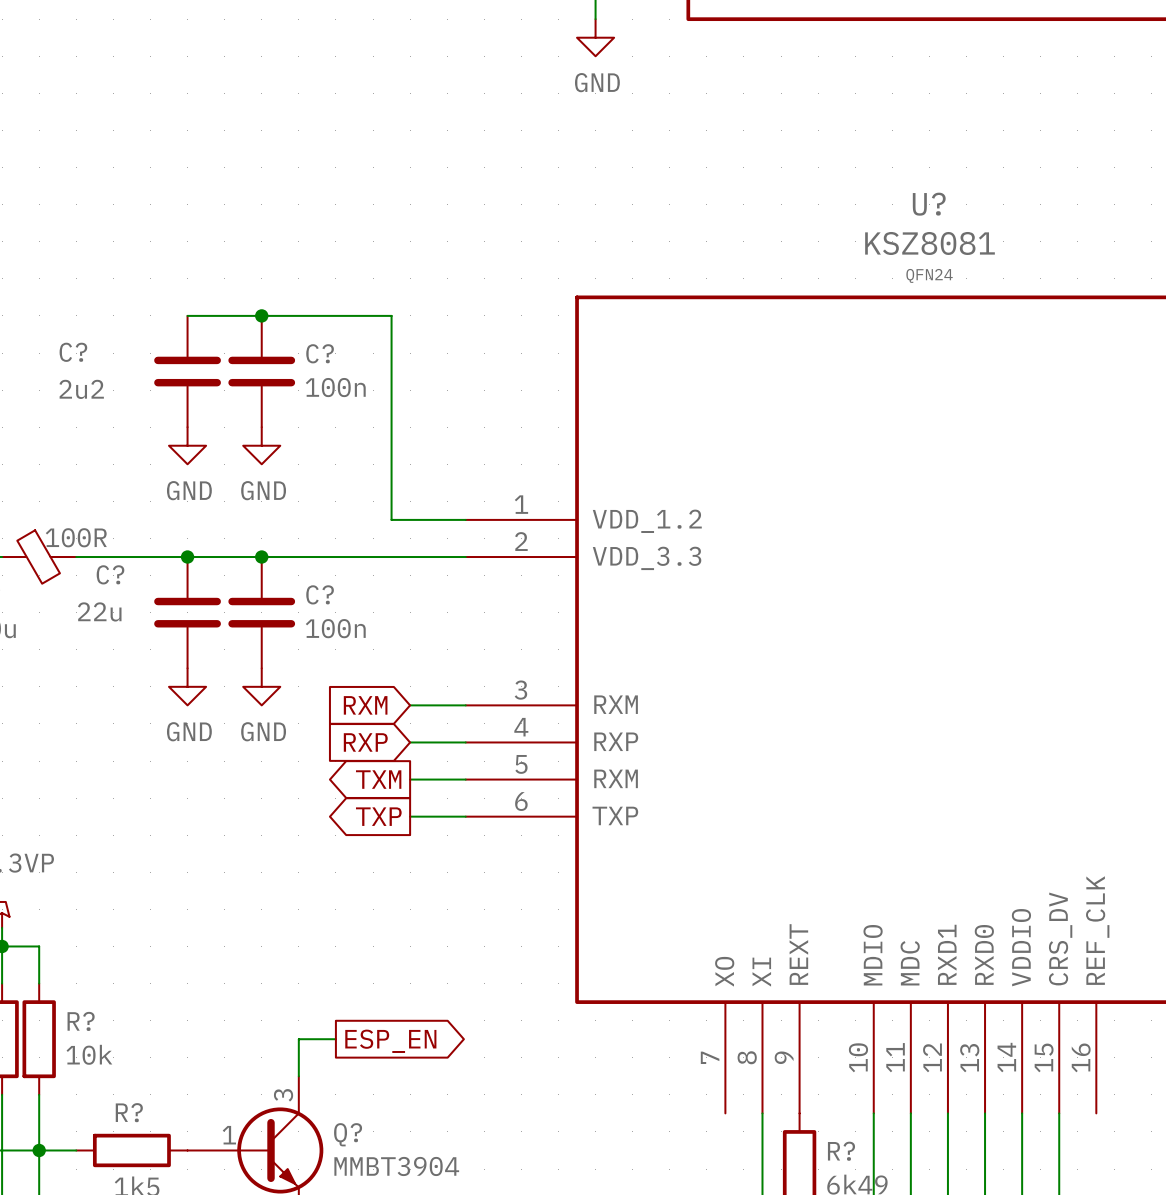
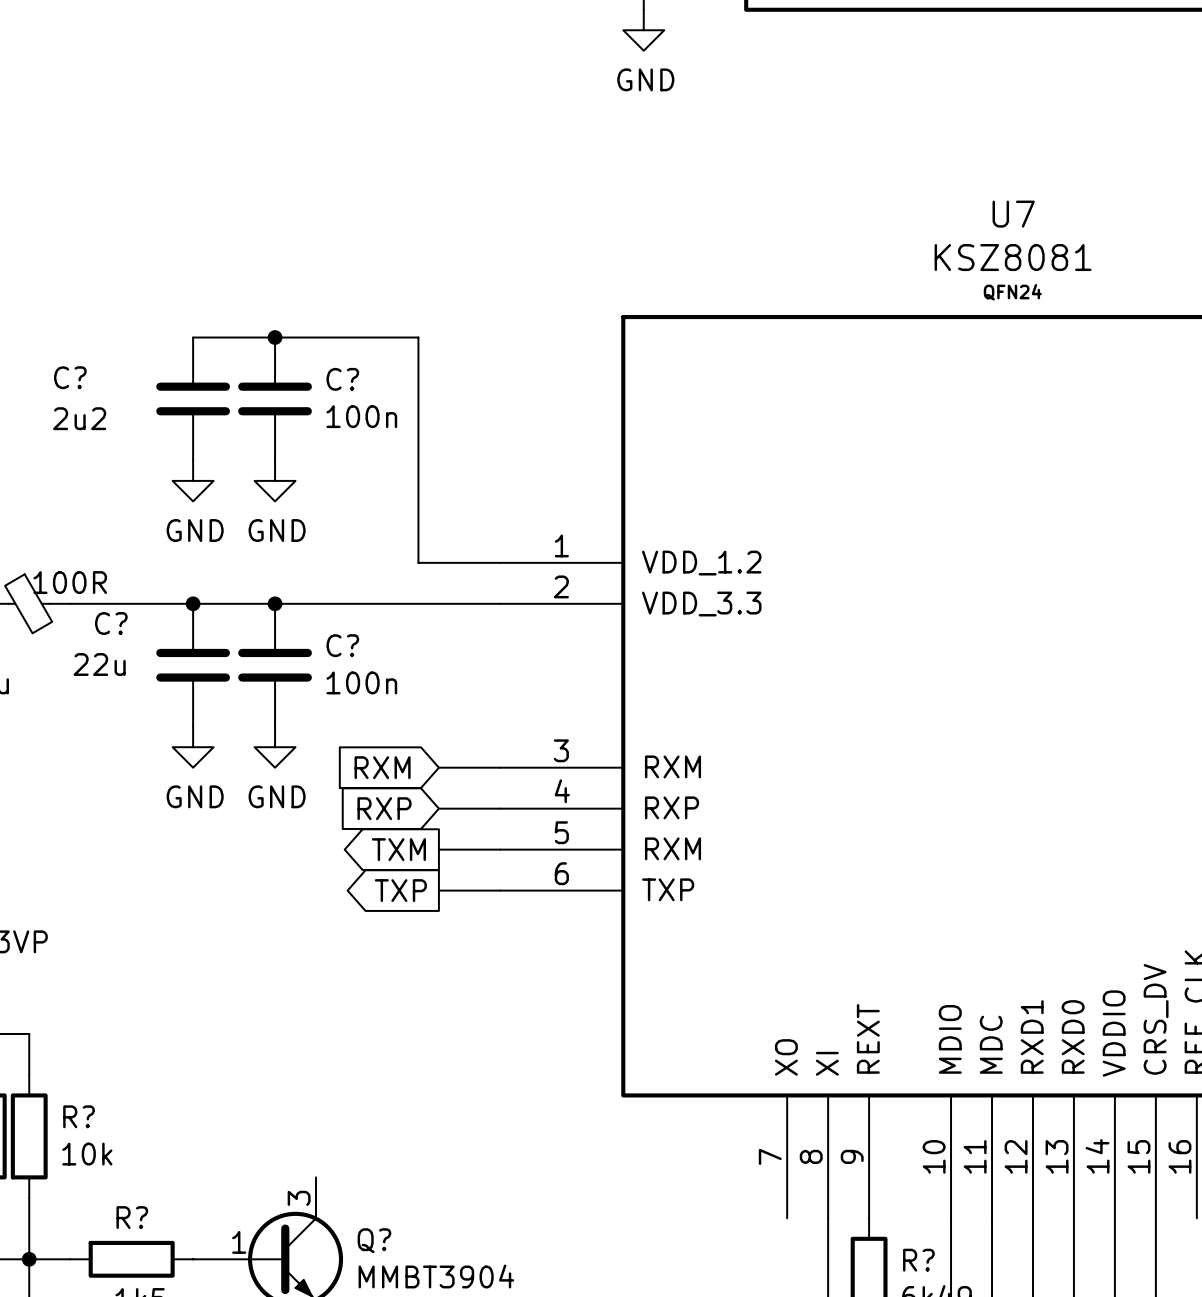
U? name: U? (929, 204) -> U7 (1013, 214)
wire: (335, 1039) (298, 1039) (298, 1076) -> none
global label: ESP_EN (390, 1041) -> none

